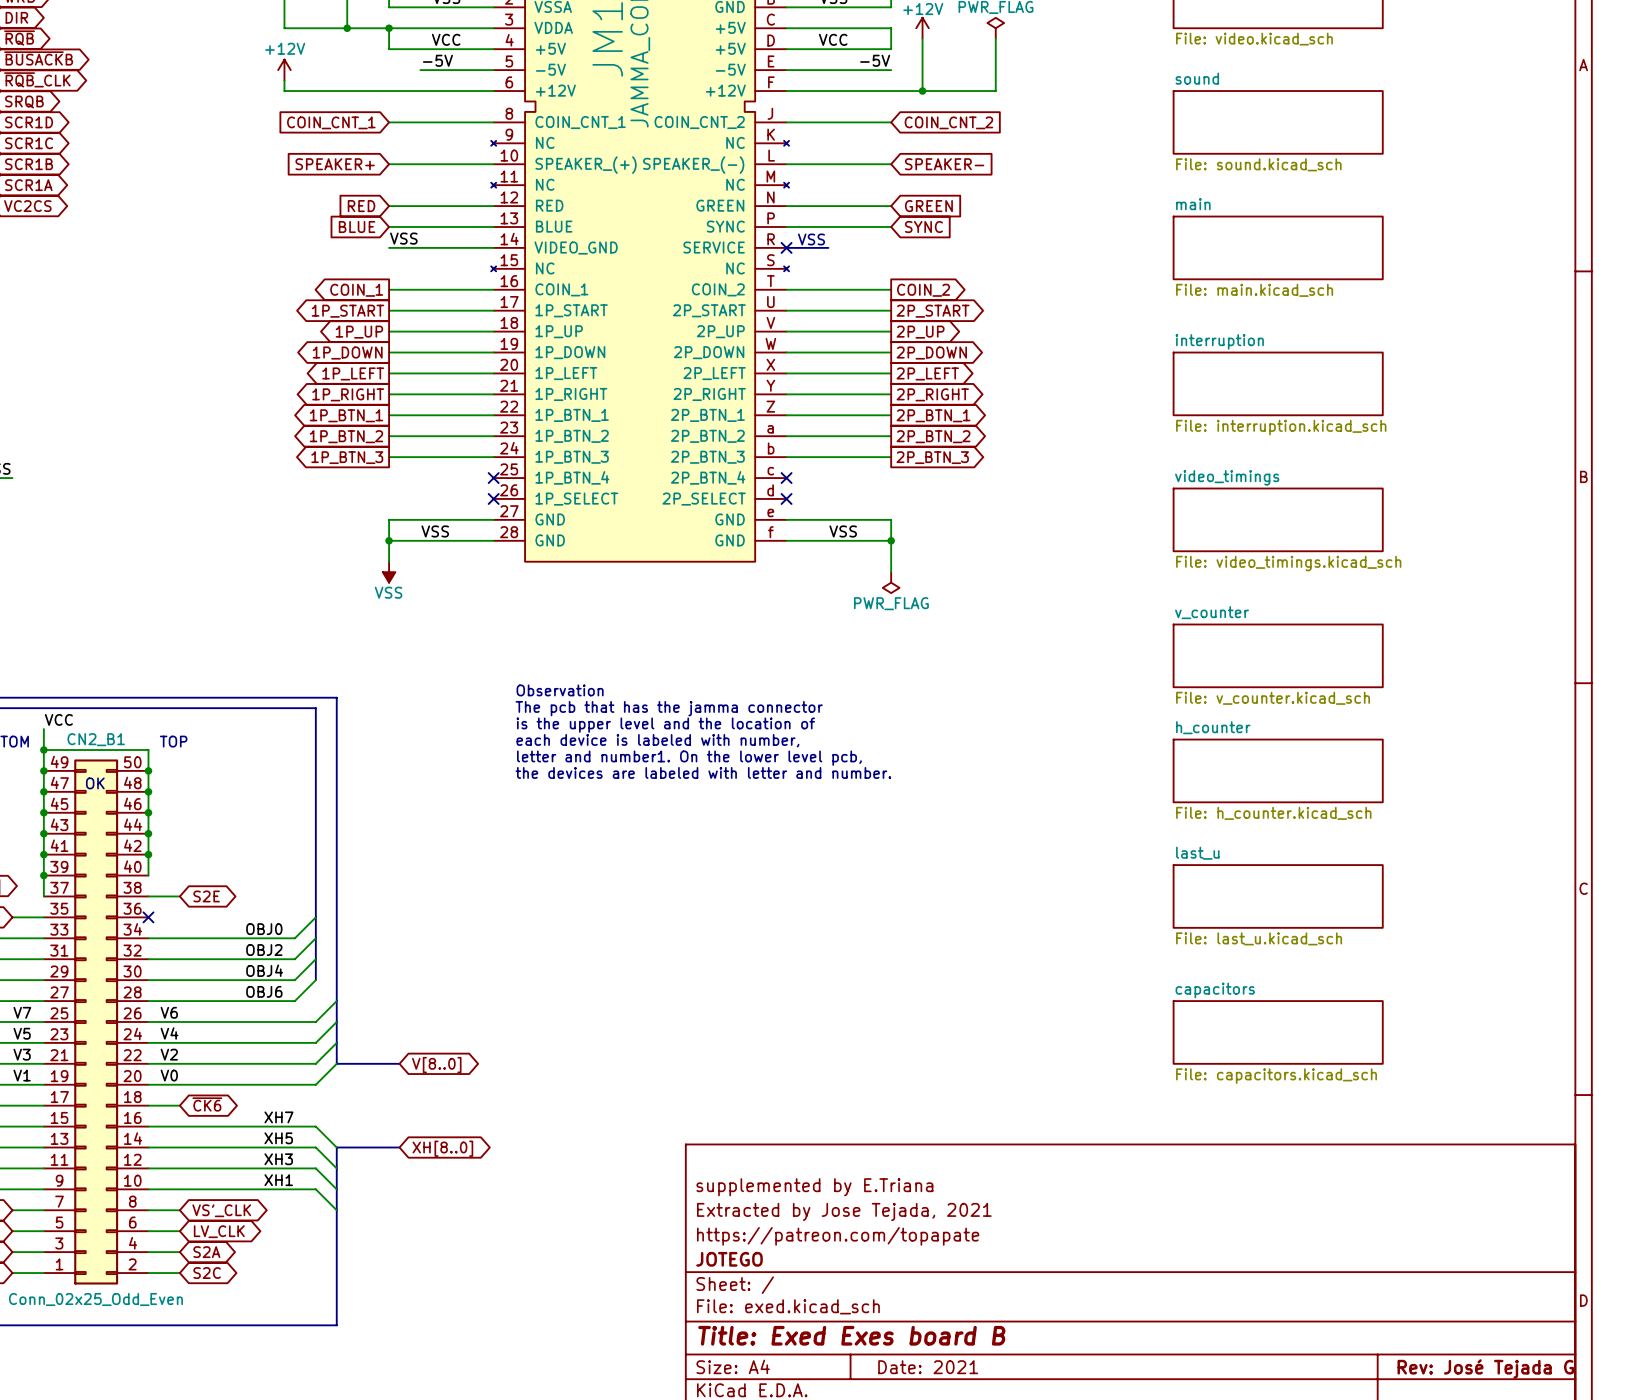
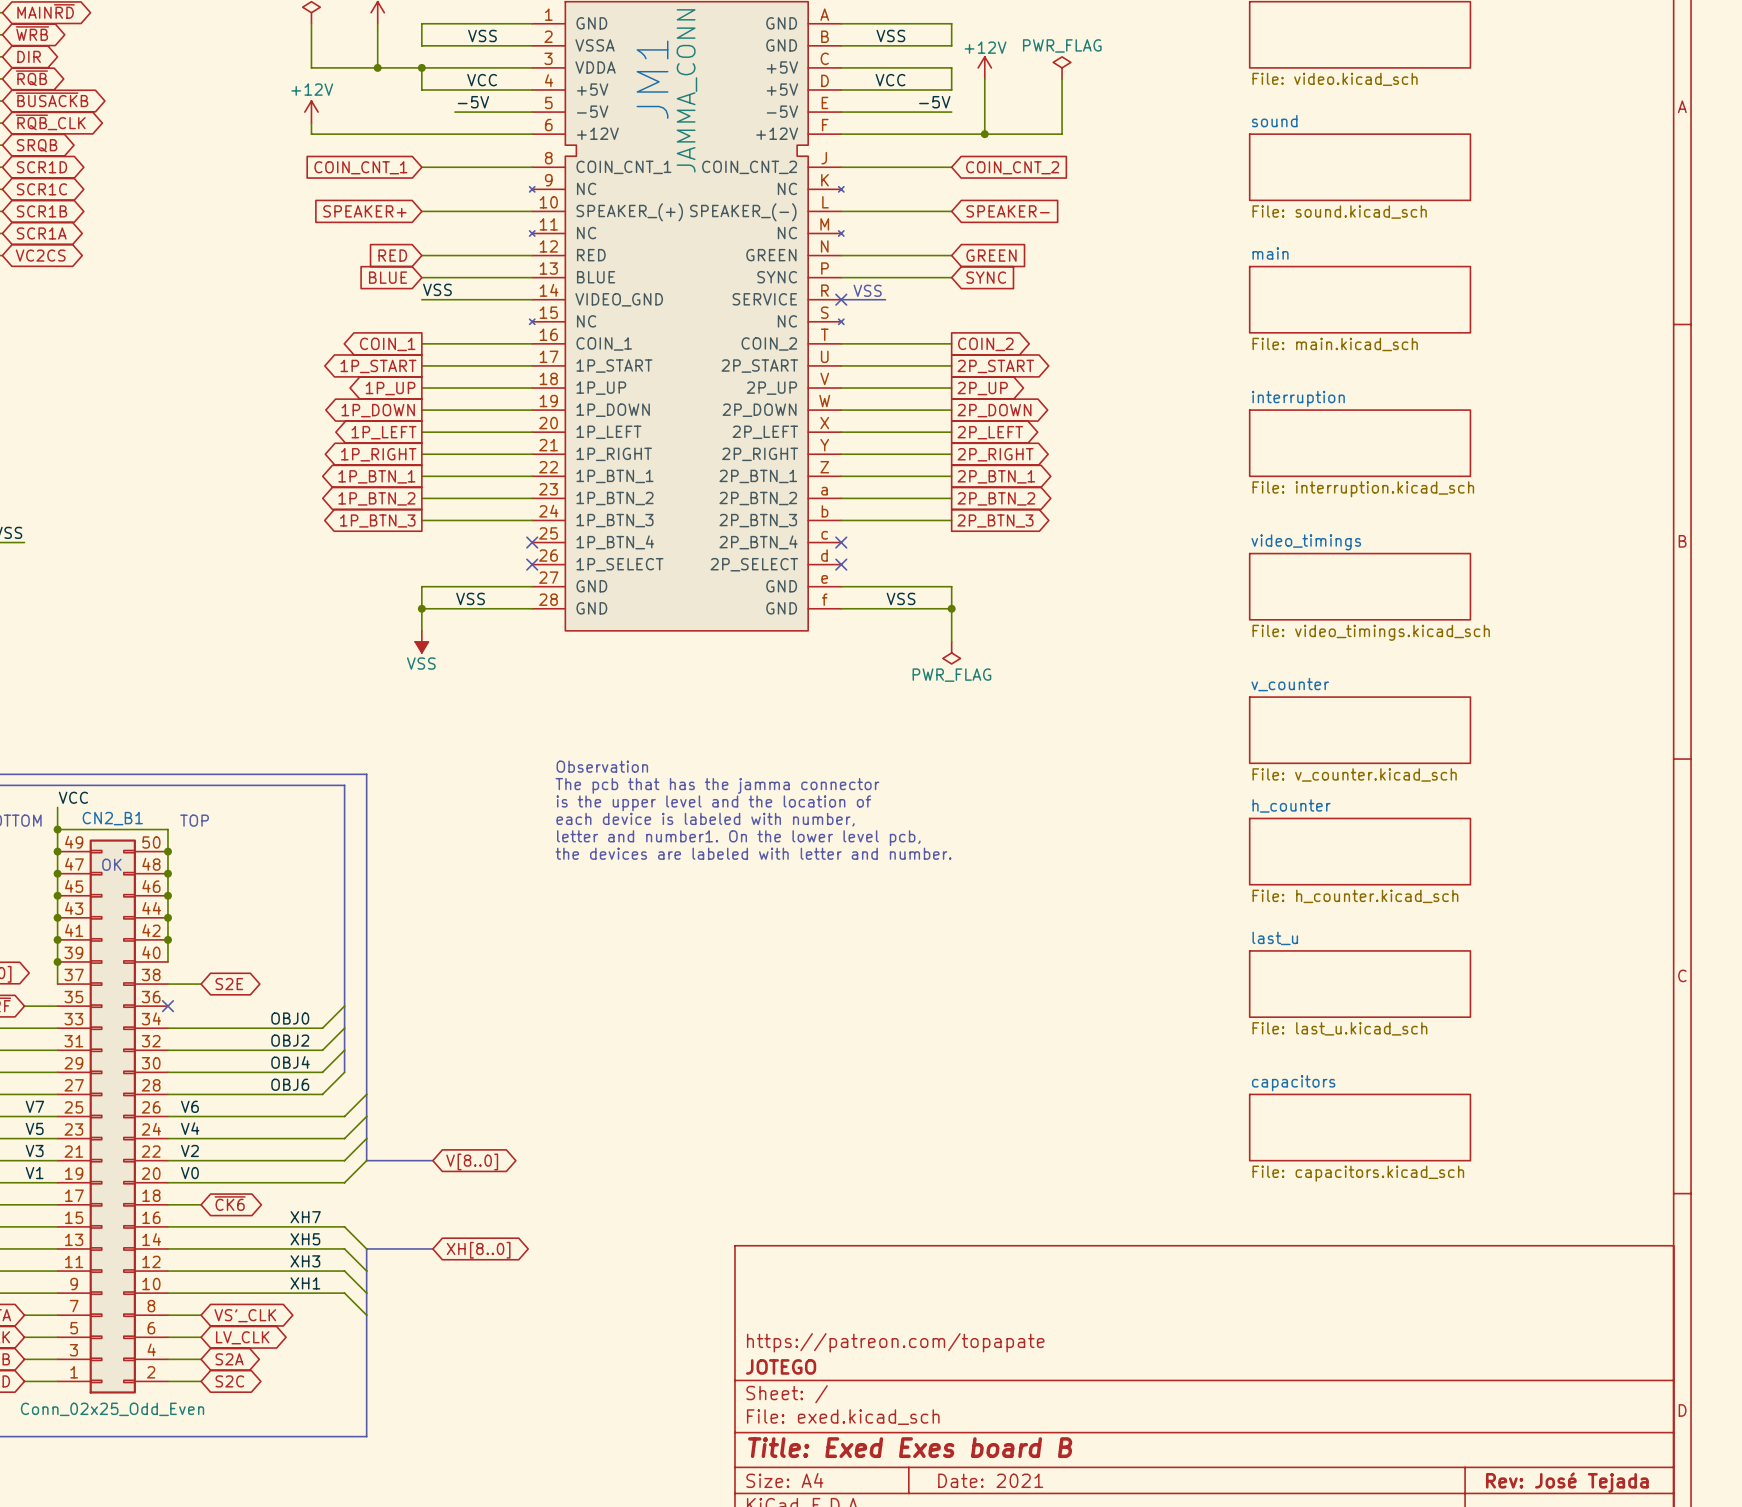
title block: supplemented by E.Triana (814, 1187) -> none
title block: Extracted by Jose Tejada, 2021 (844, 1211) -> none
title block: Rev: José Tejada G (1485, 1368) -> Rev: José Tejada (1567, 1482)

